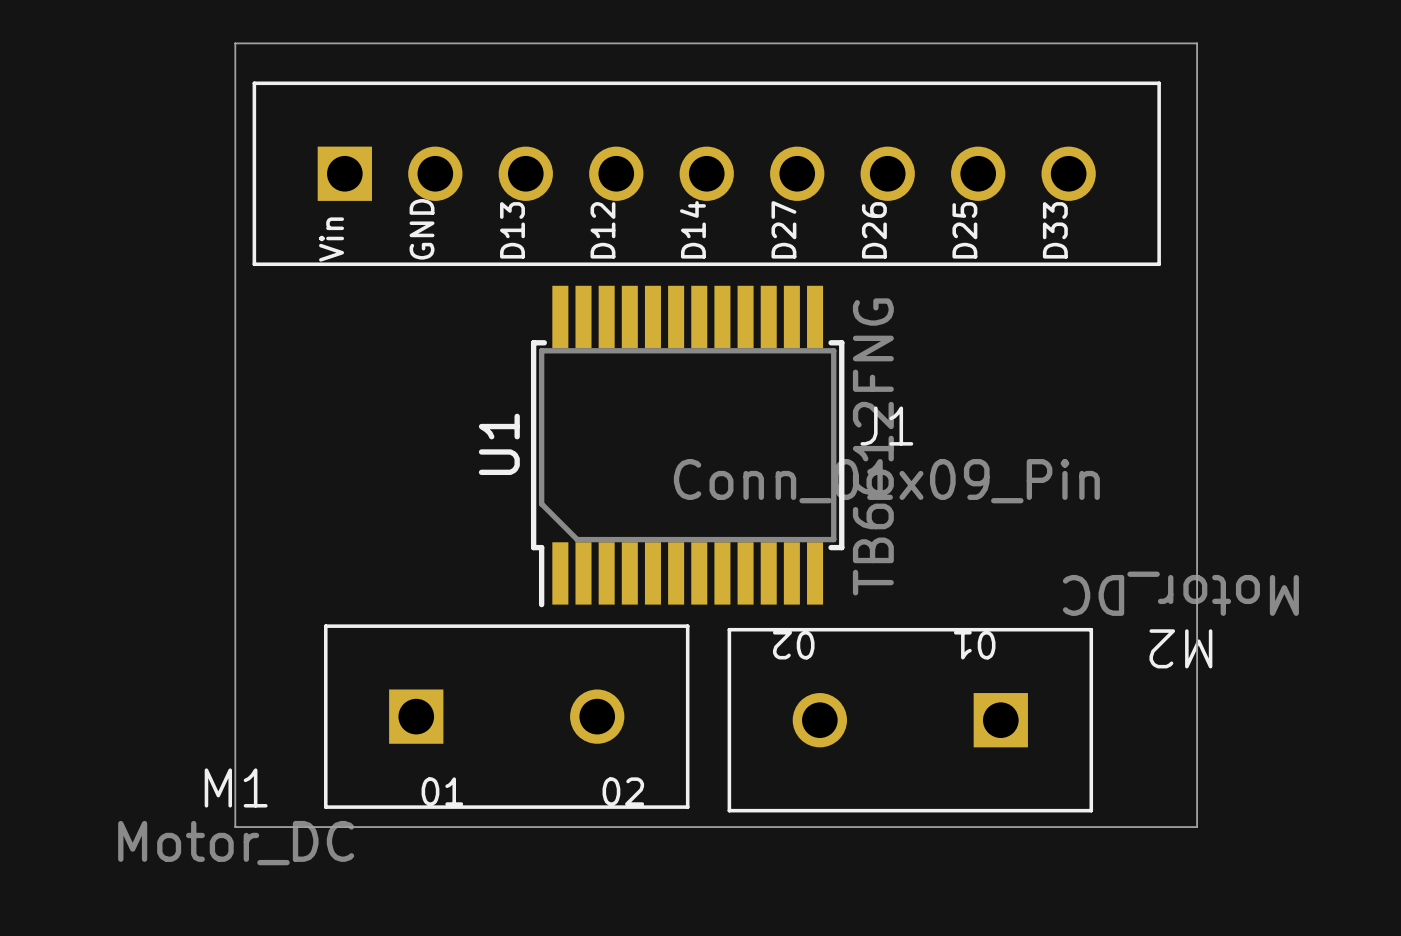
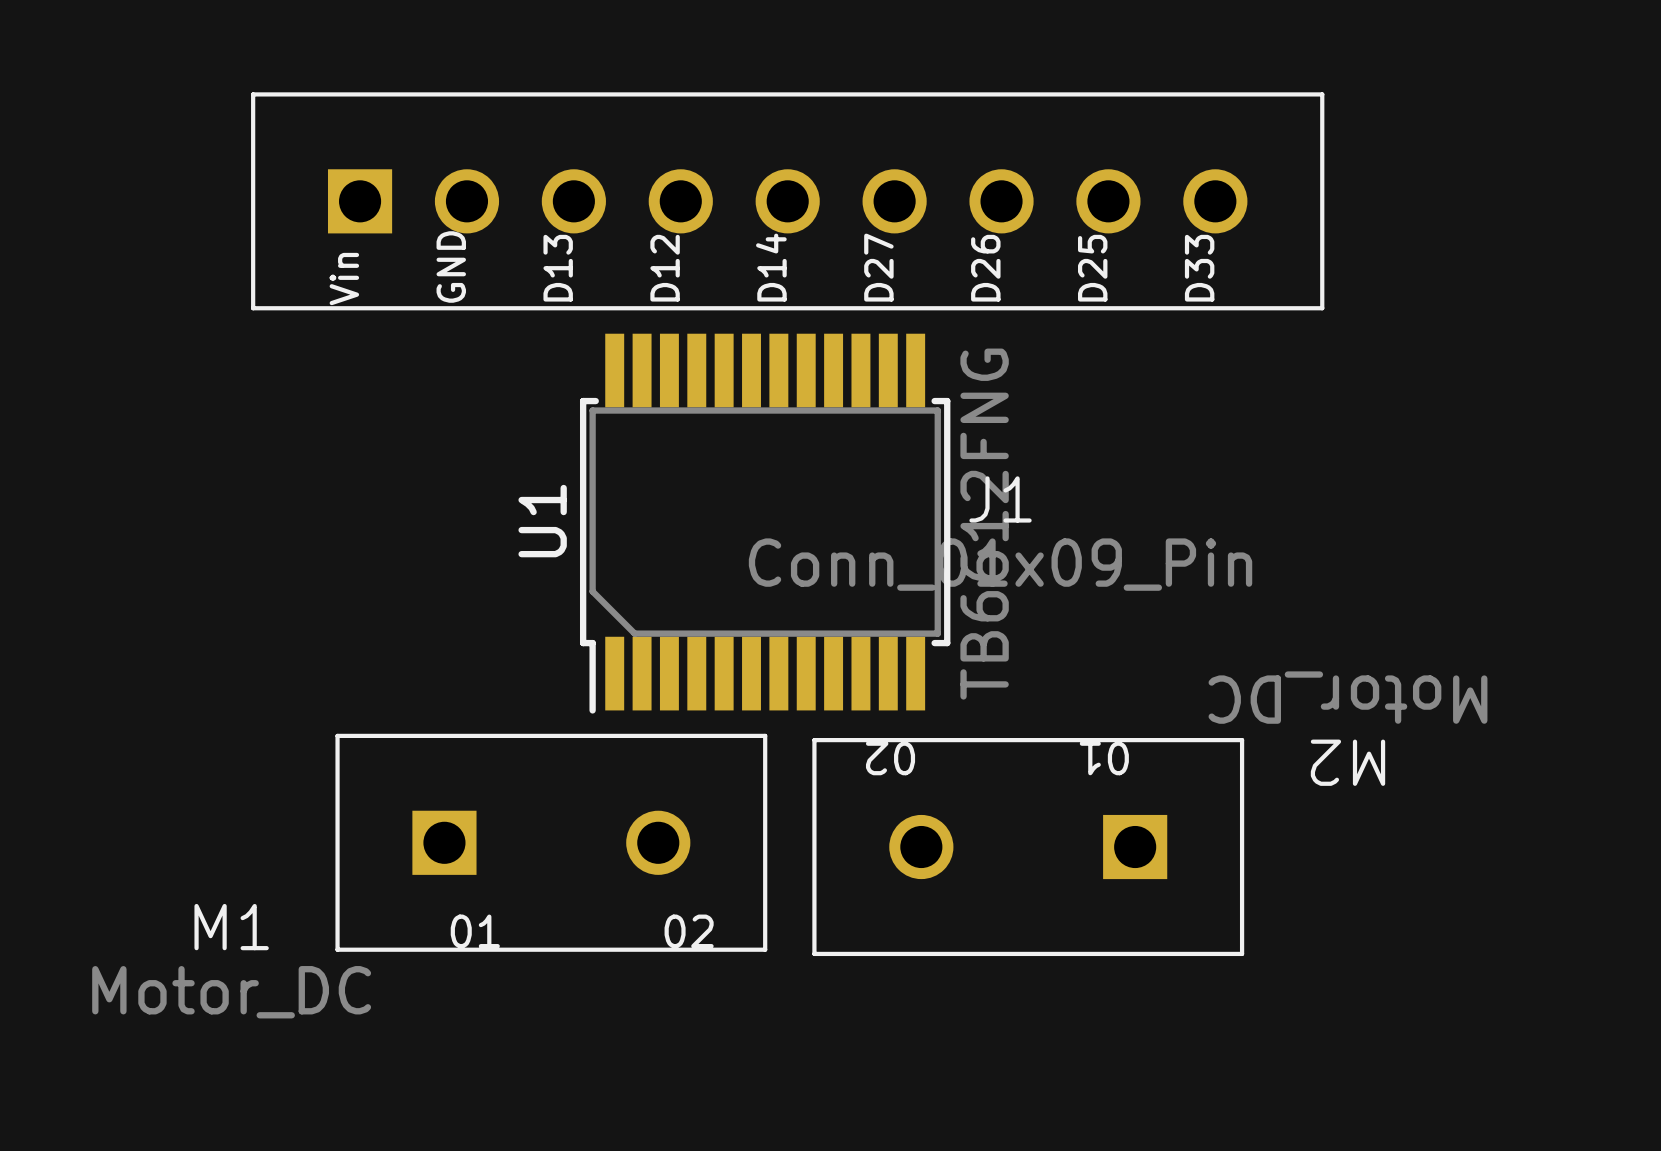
board edge: (235, 43) (1197, 43) (1197, 827) (235, 827) (235, 43) -> none

